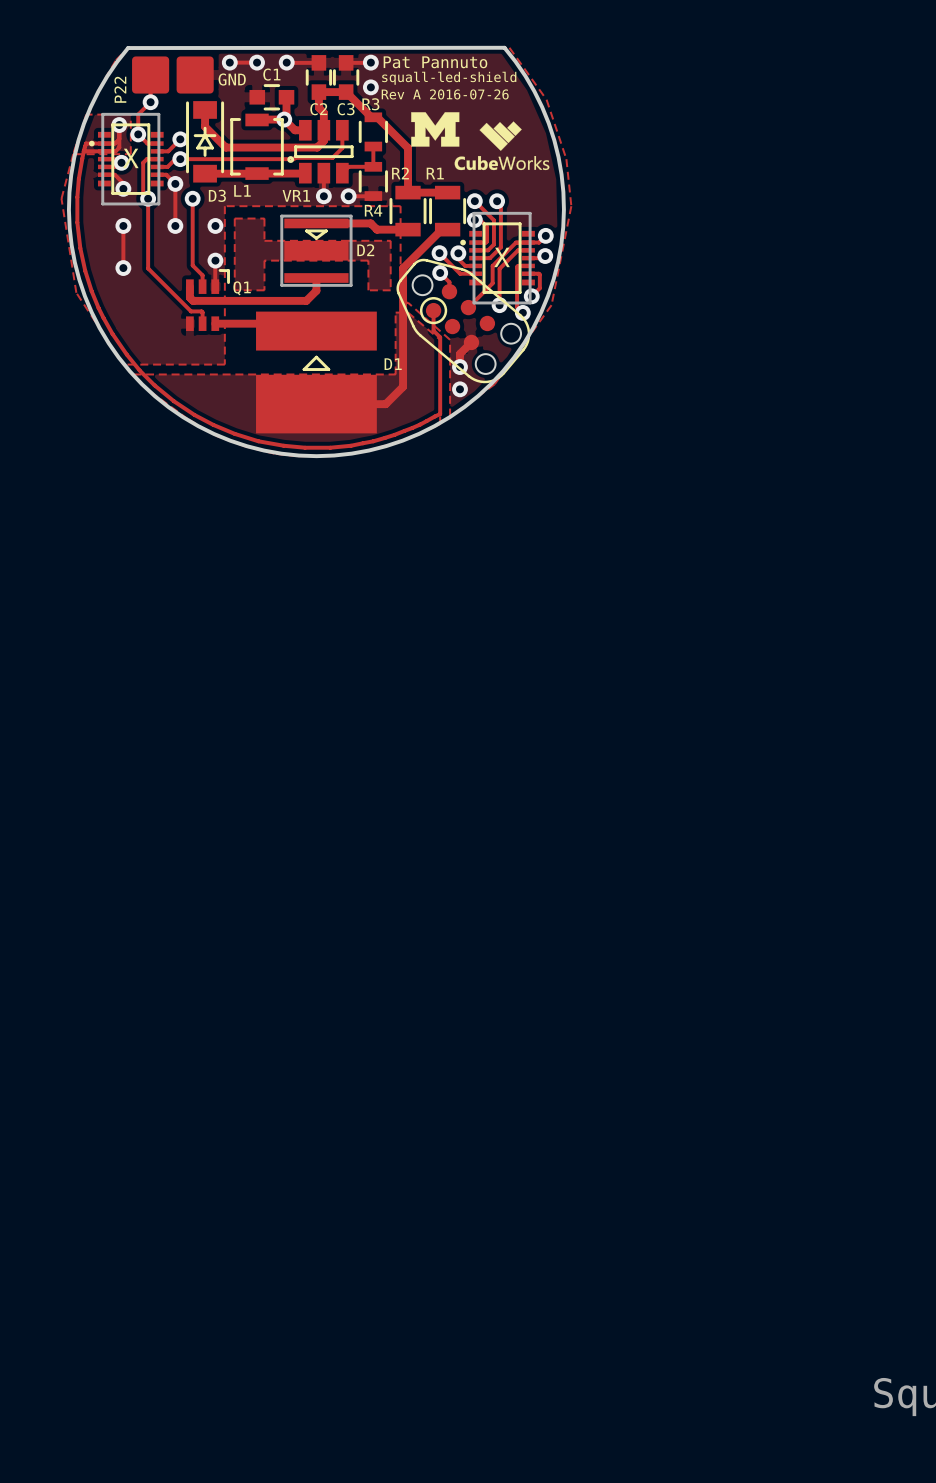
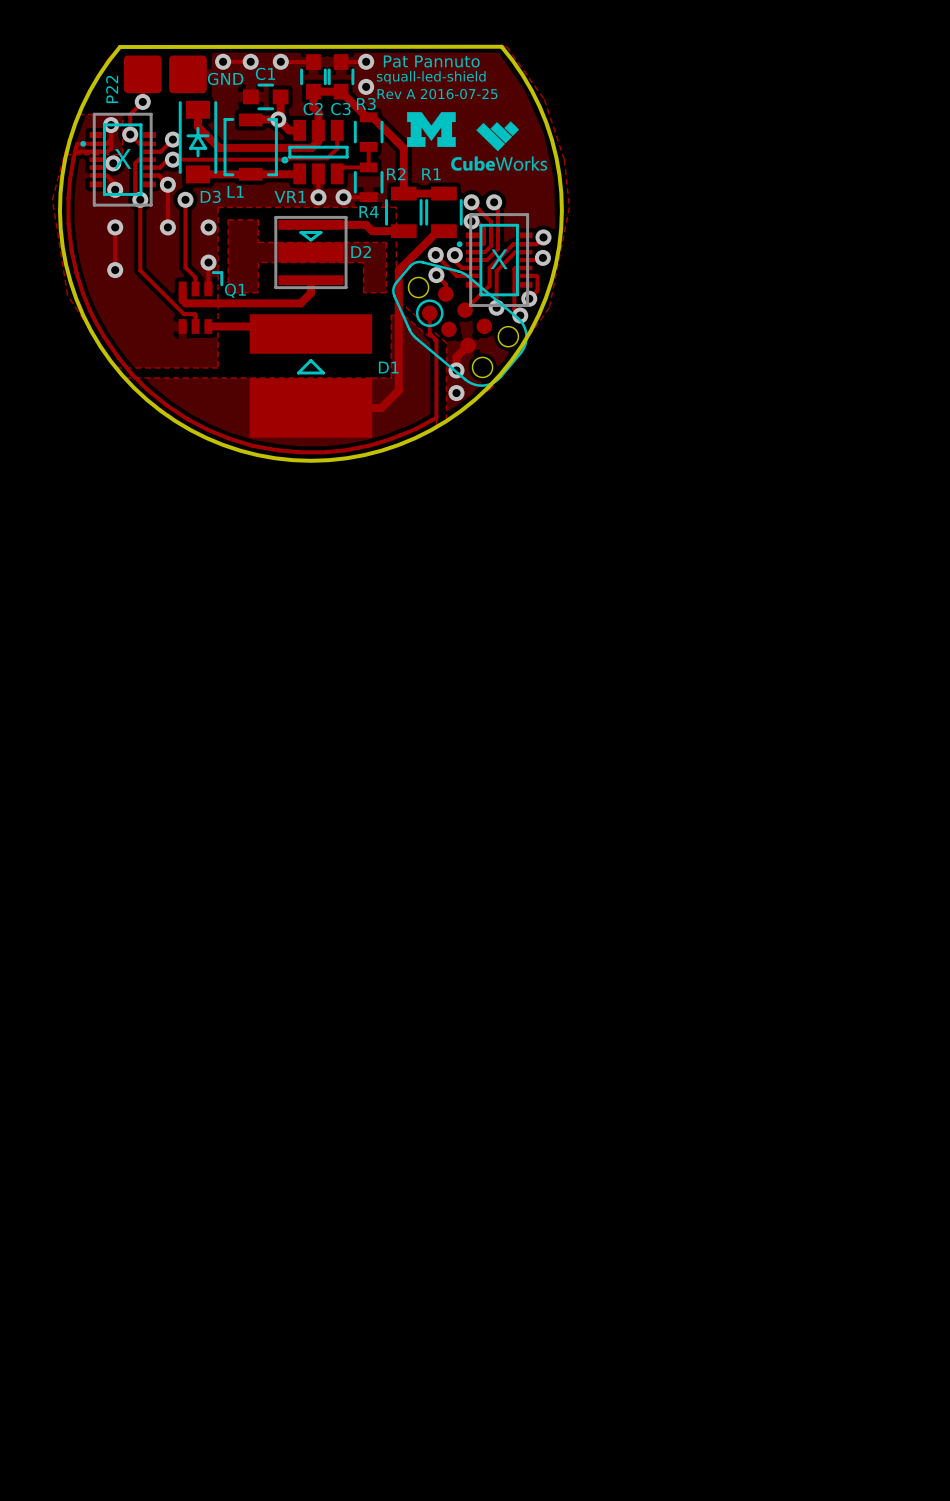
text: Rev A 2016-07-26 (445, 94) -> Rev A 2016-07-25 (437, 94)

